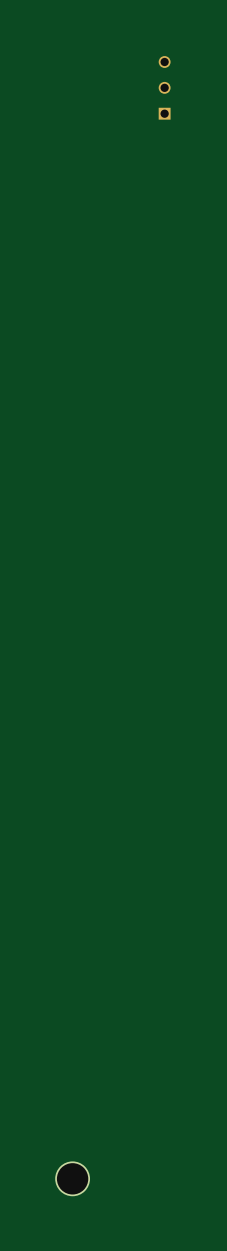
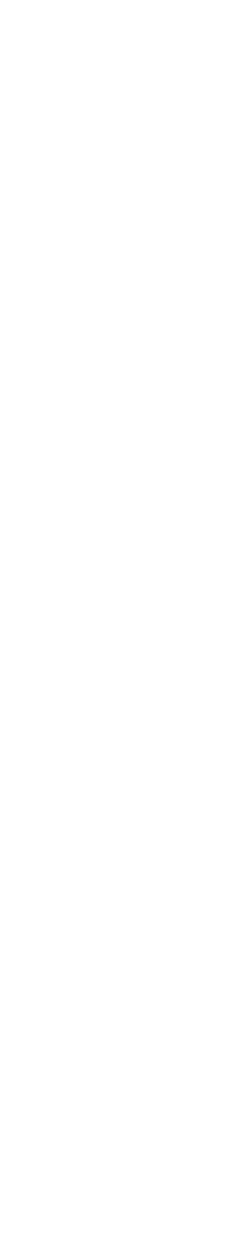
part: (164, 87) -> none
part: (72, 1178) -> none

